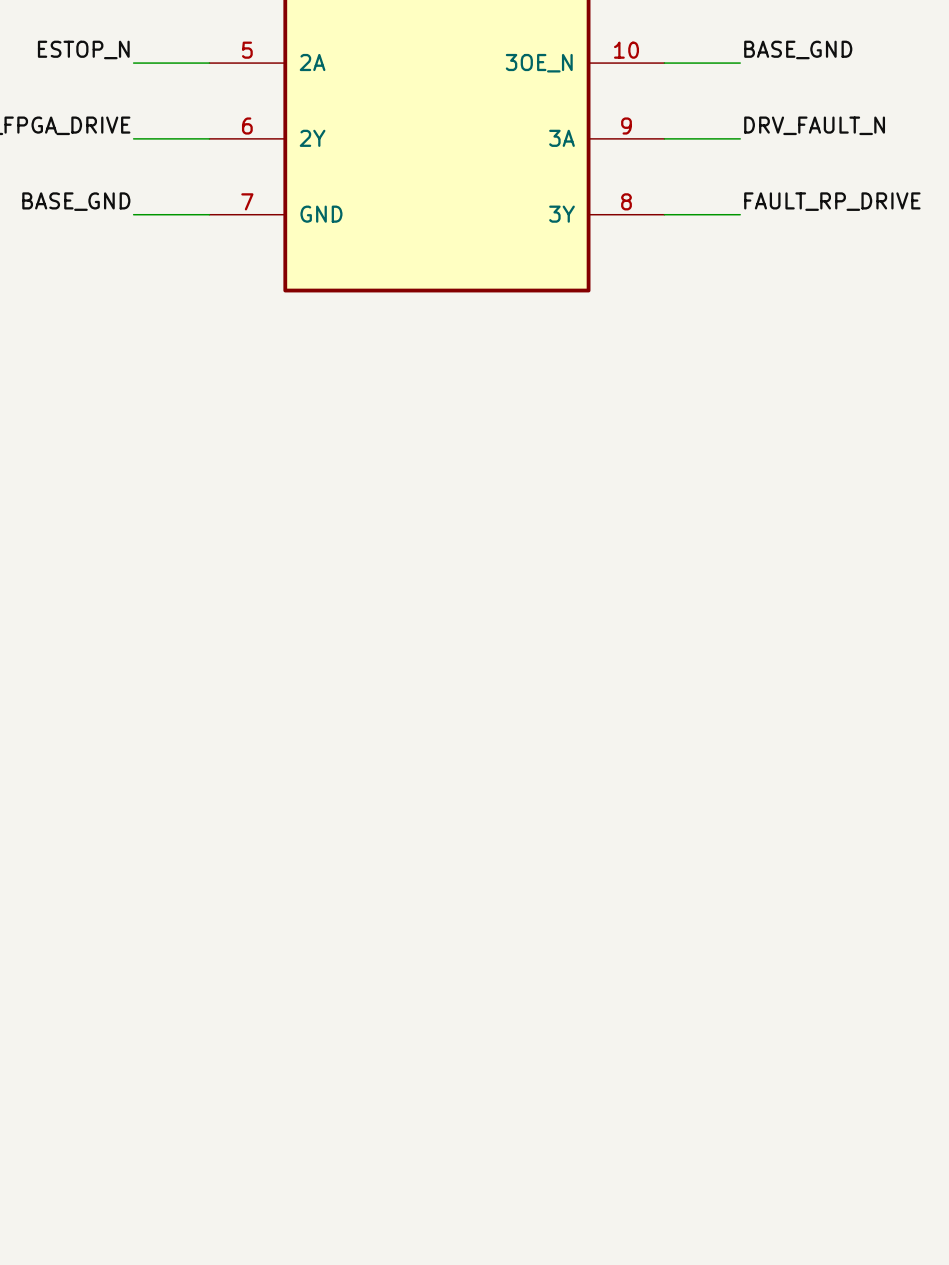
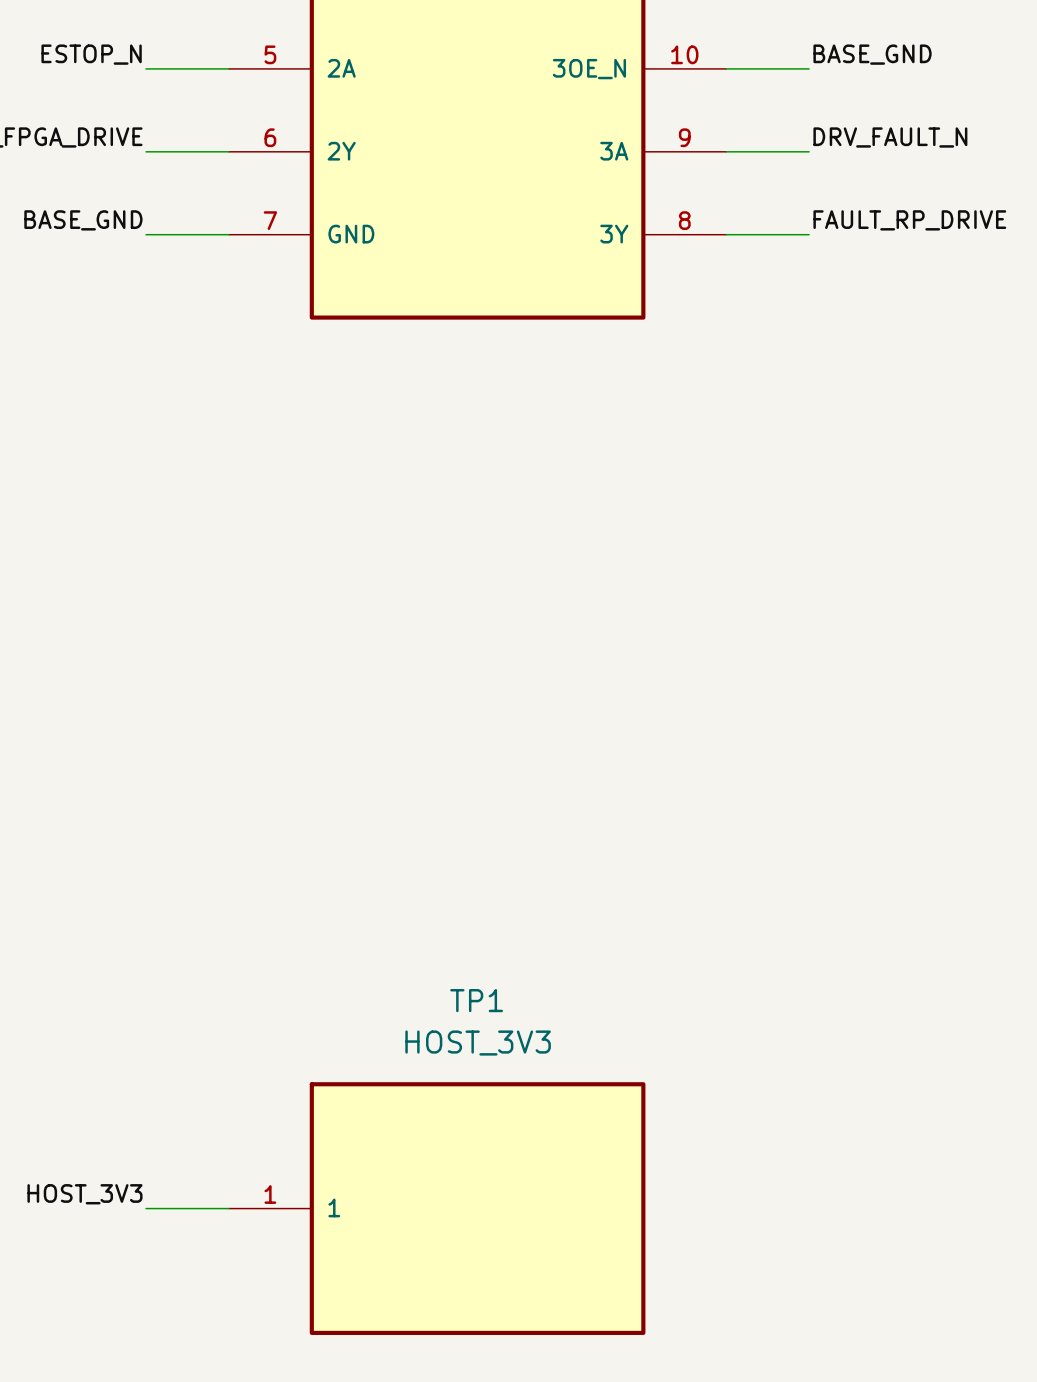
label: none -> HOST_3V3 (84, 1194)
wire: none -> (146, 1208) (228, 1208)
TP1: none -> HOST_3V3 (437, 1208)

